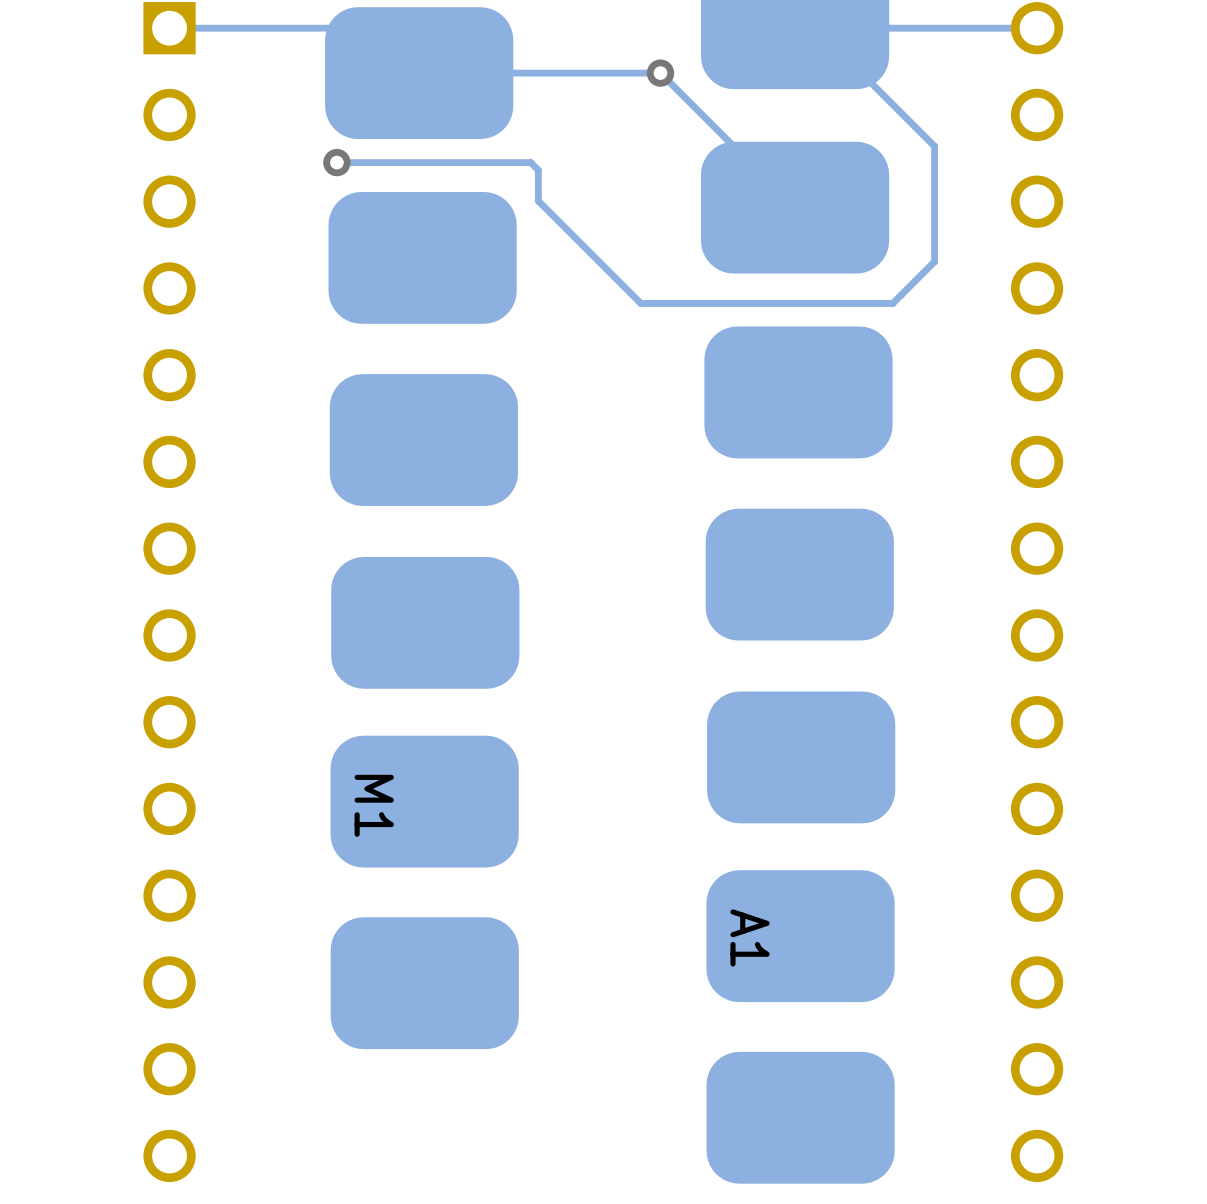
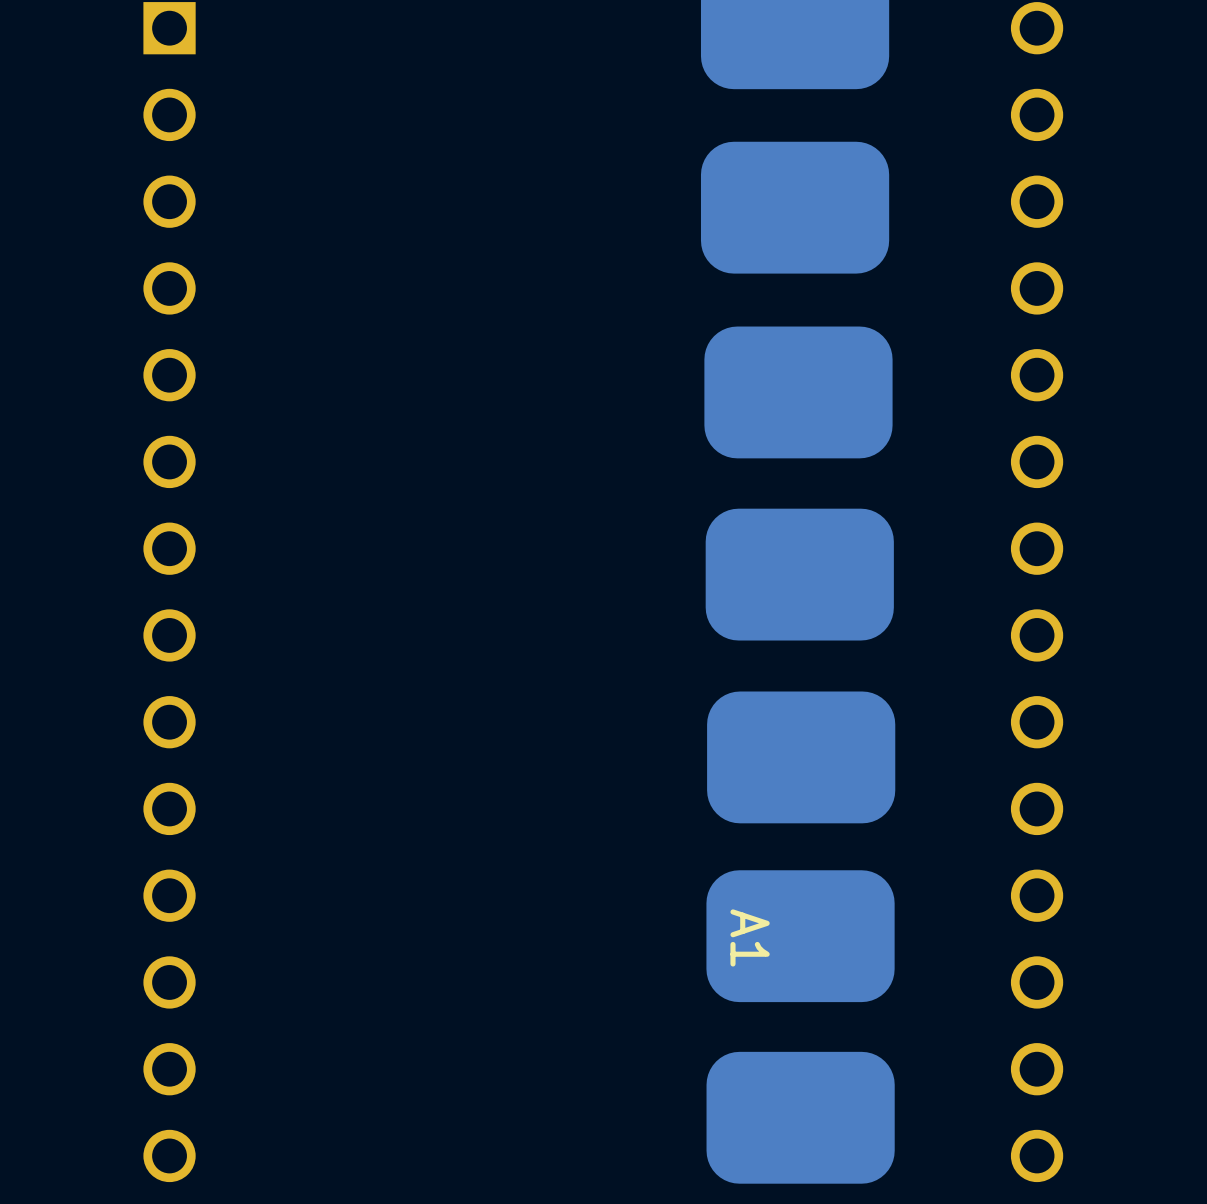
track: (169, 28) (374, 28) (419, 73) (660, 73) (795, 207) -> none
track: (1037, 28) (800, 28) (795, 23) (811, 23) (934, 146) (934, 261) (892, 303) (640, 303) (538, 201) (538, 170) (530, 162) (330, 162) -> none
via: (660, 73) -> none
via: (336, 162) -> none
M1: (422, 528) -> none

